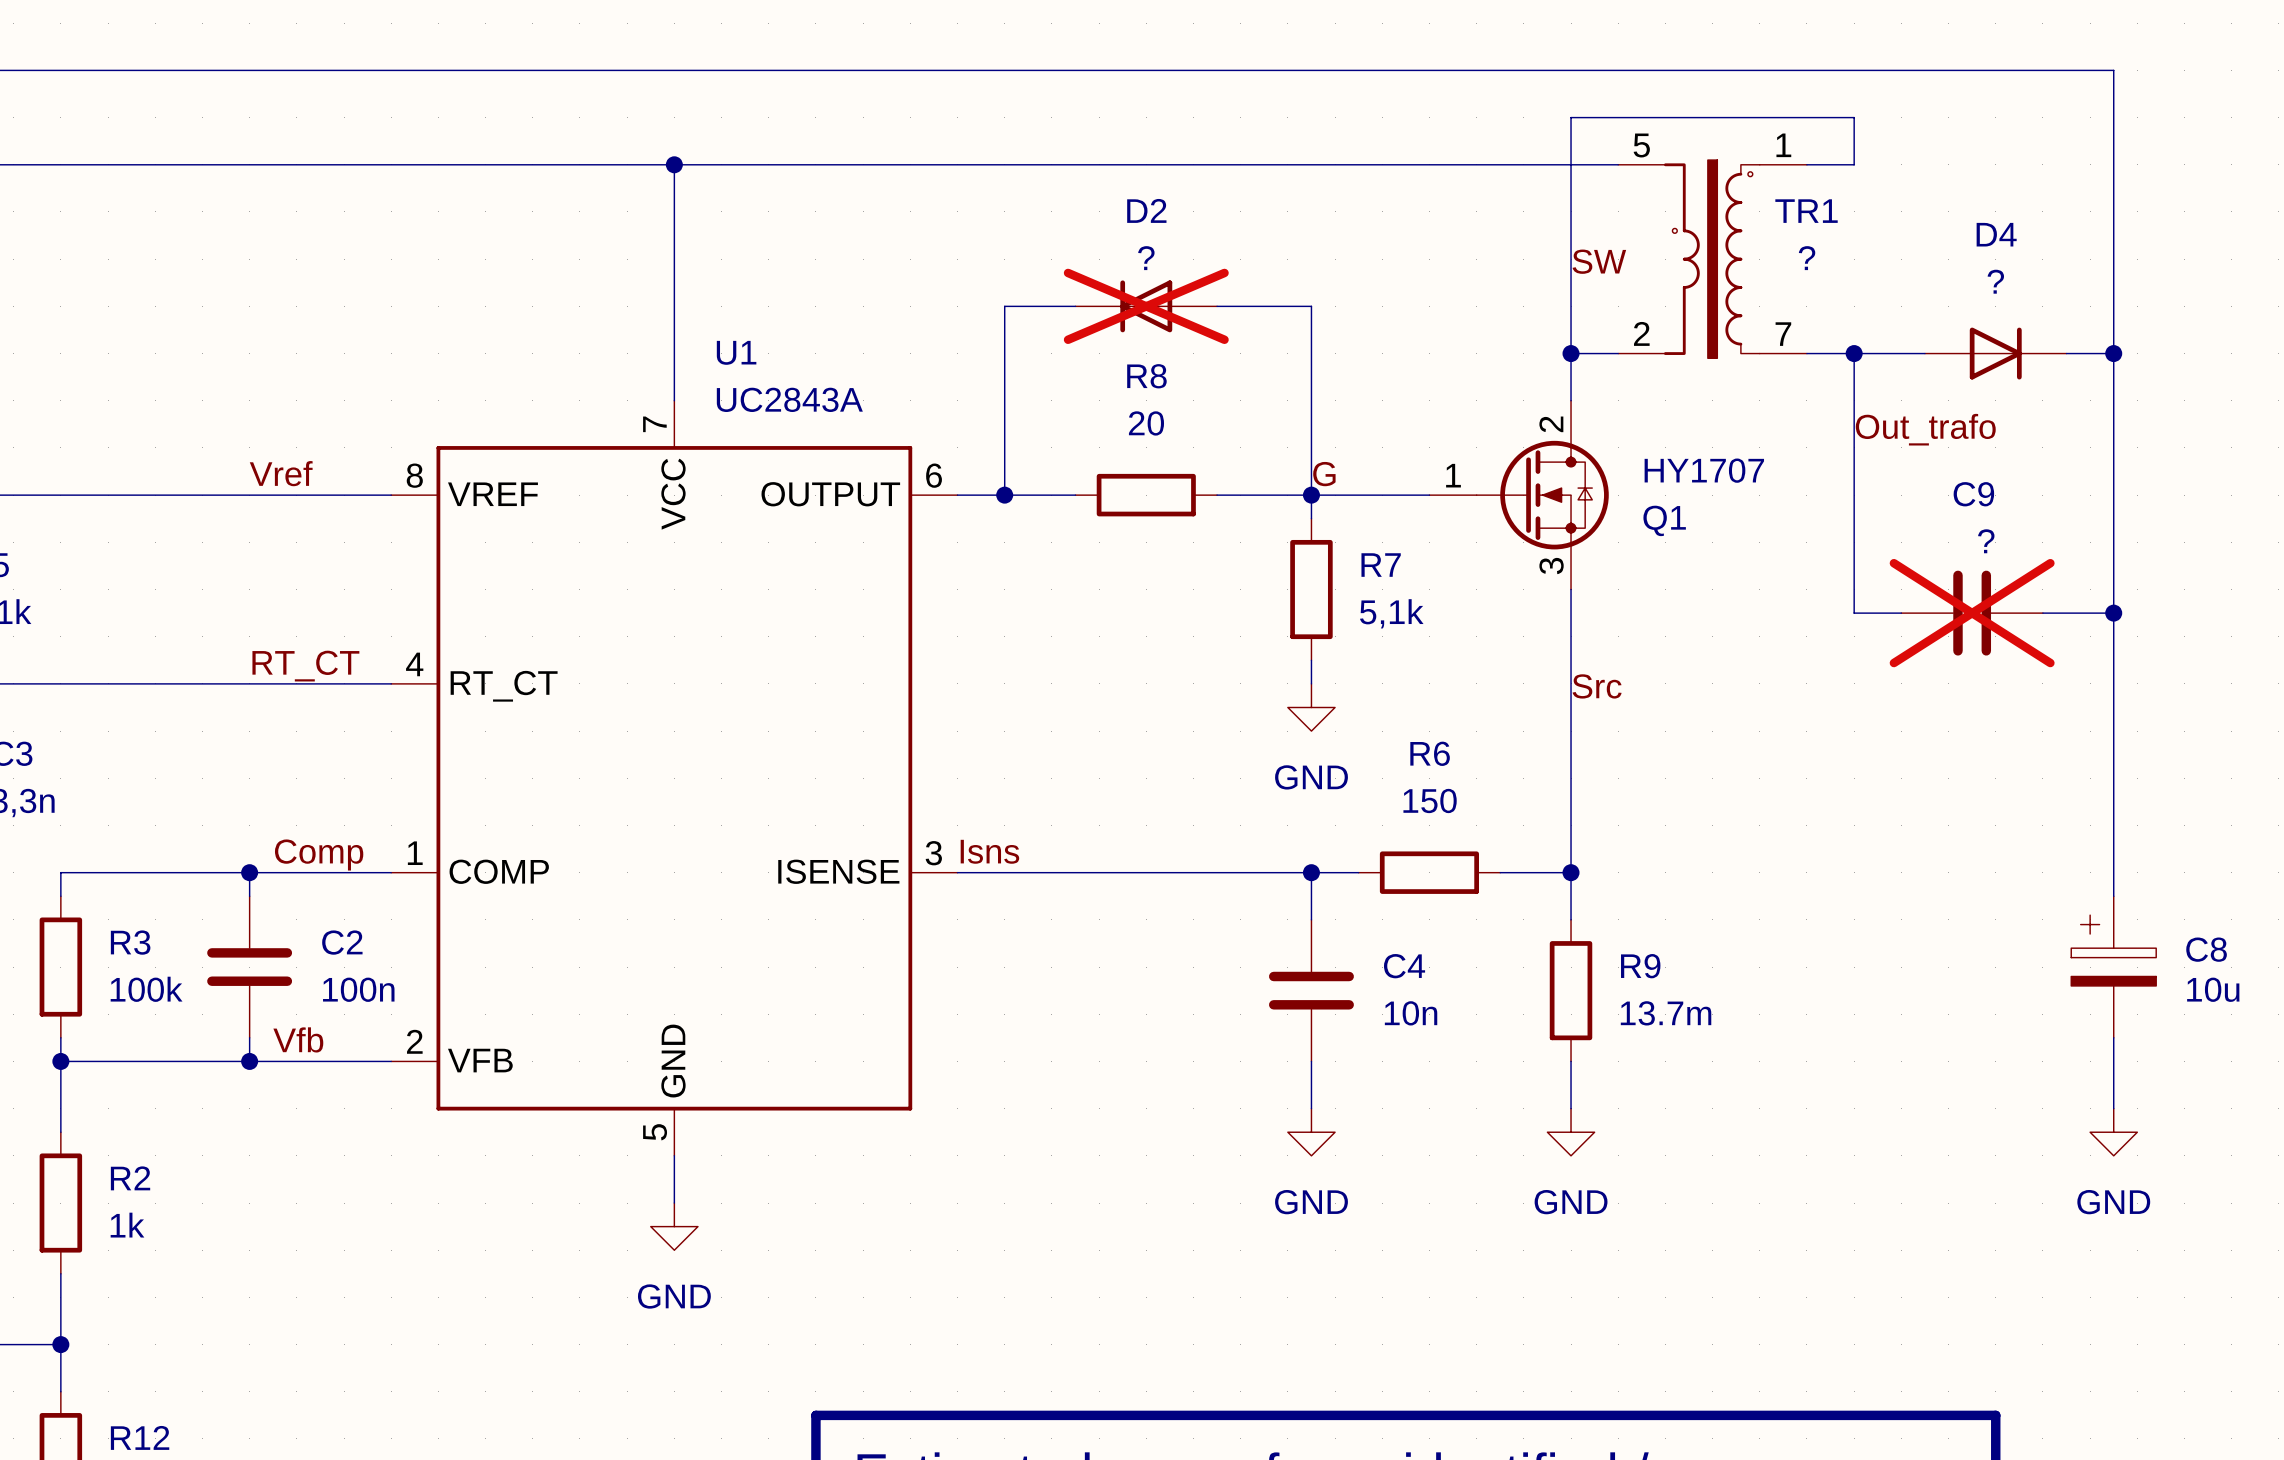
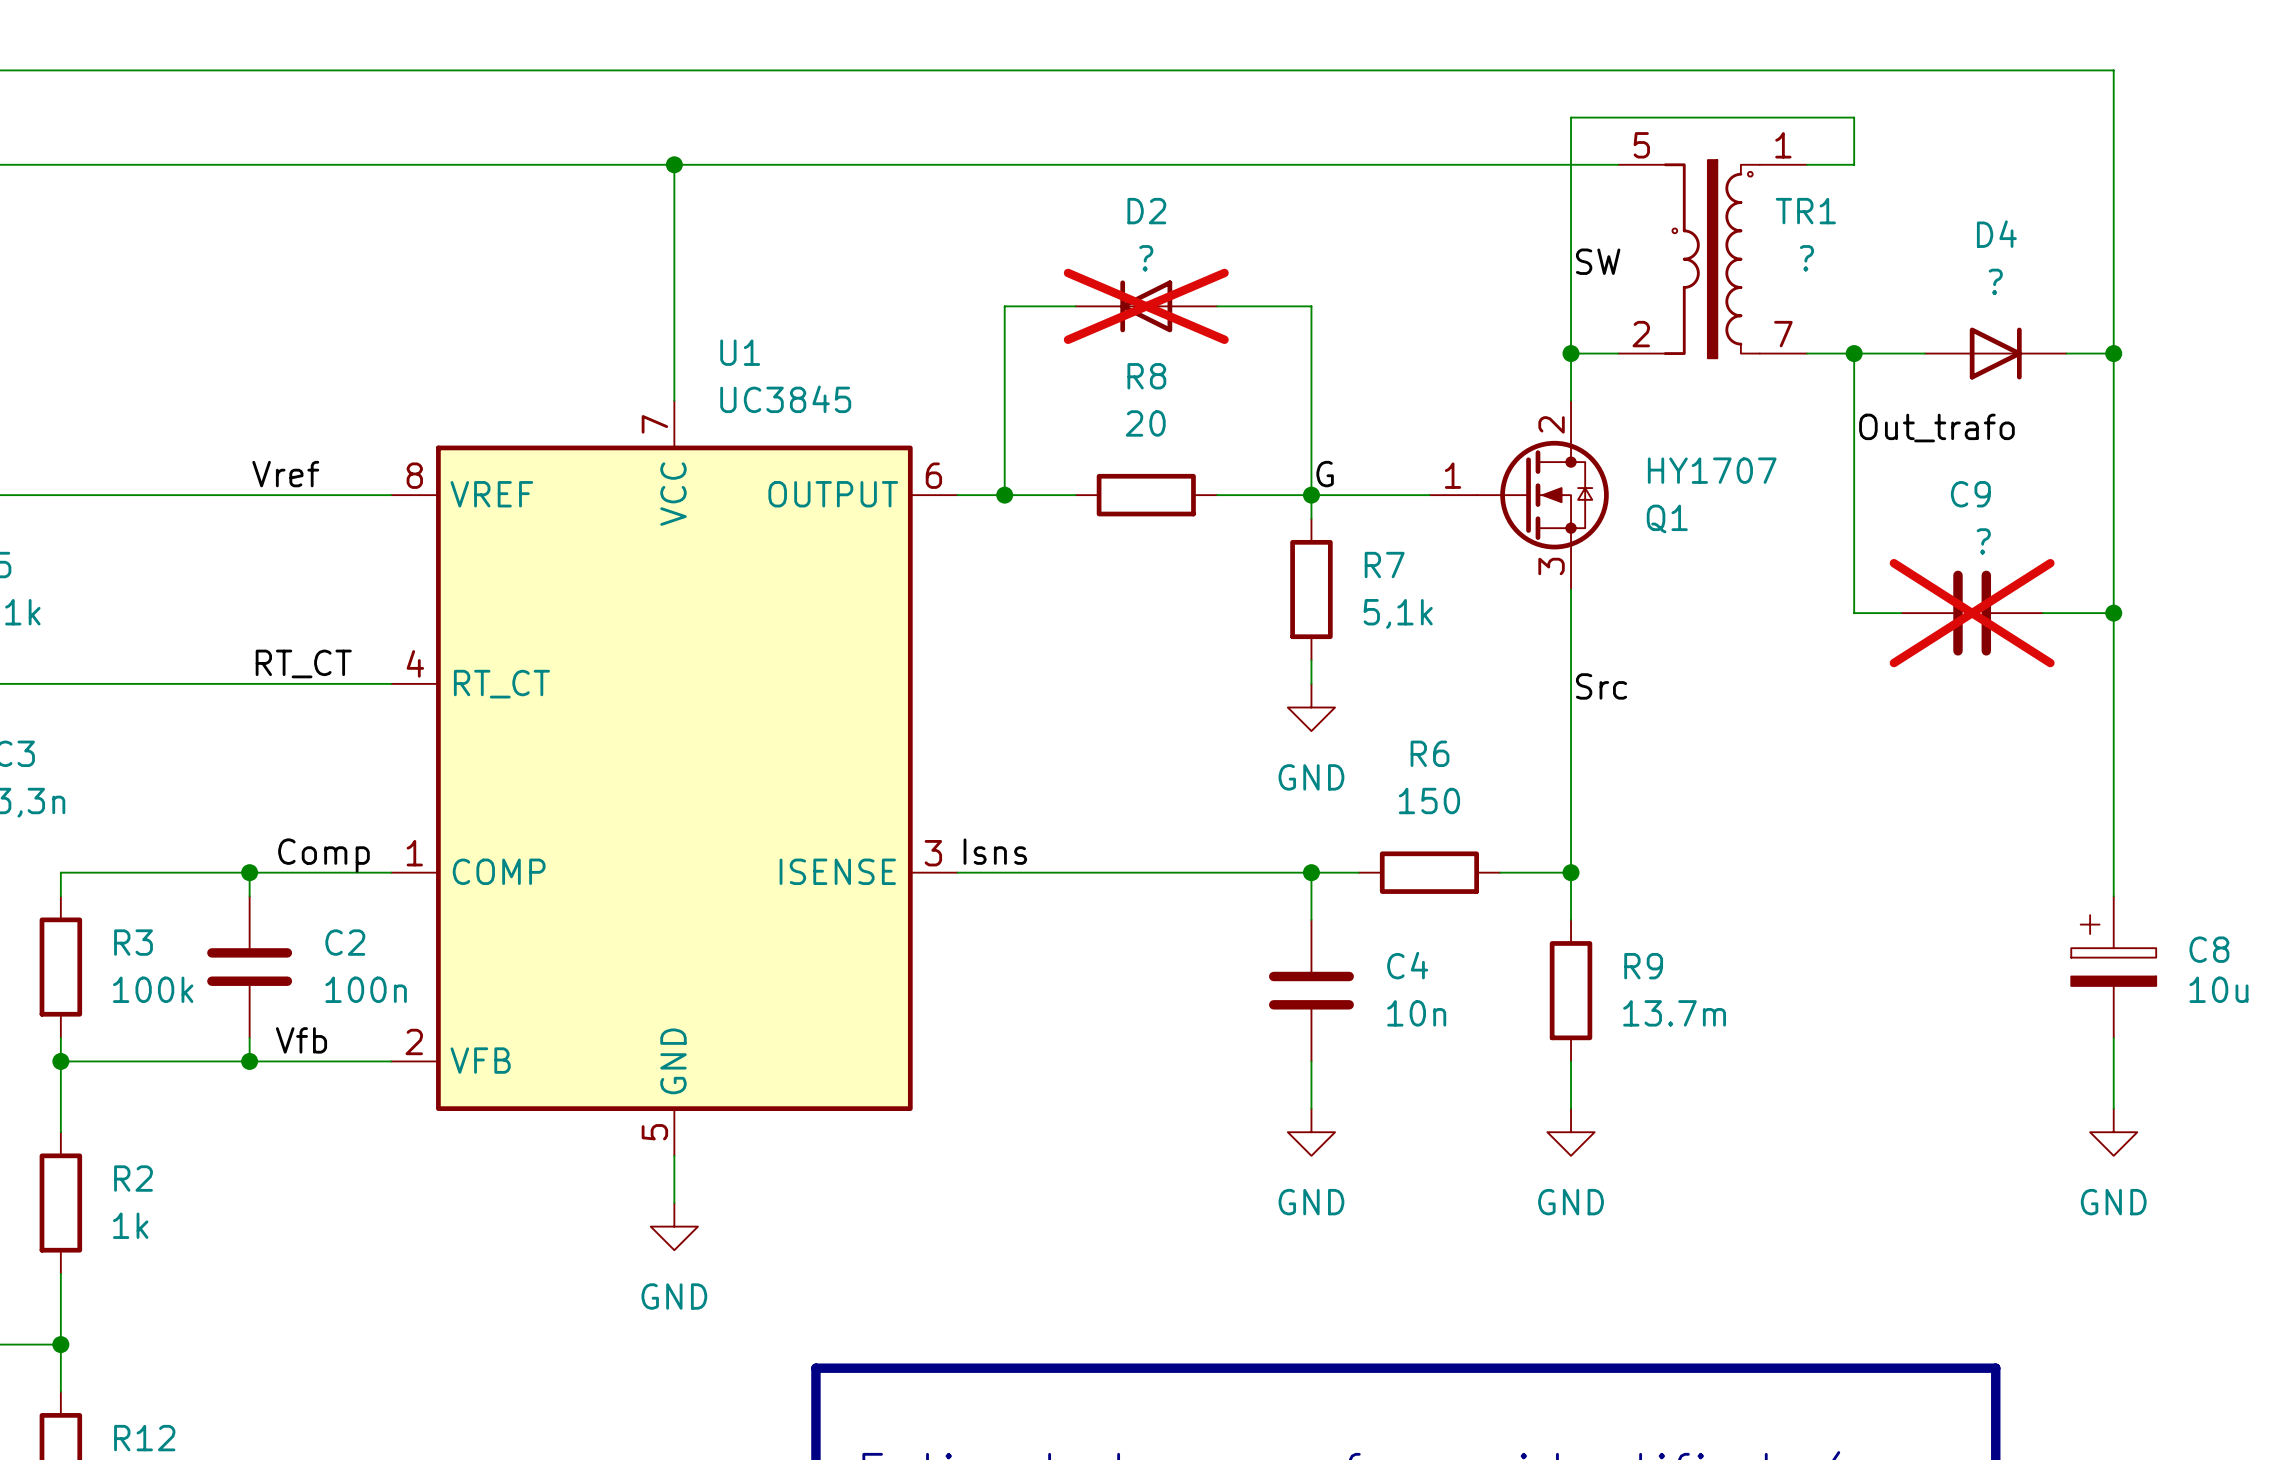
U1 value: UC2843A (789, 399) -> UC3845 (785, 399)
U1 symbol: [391, 400, 958, 1156] -> [391, 400, 958, 1156]
line: (815, 1415) (1995, 1415) -> (815, 1415) (815, 1368) (1995, 1368) (1995, 1415)

